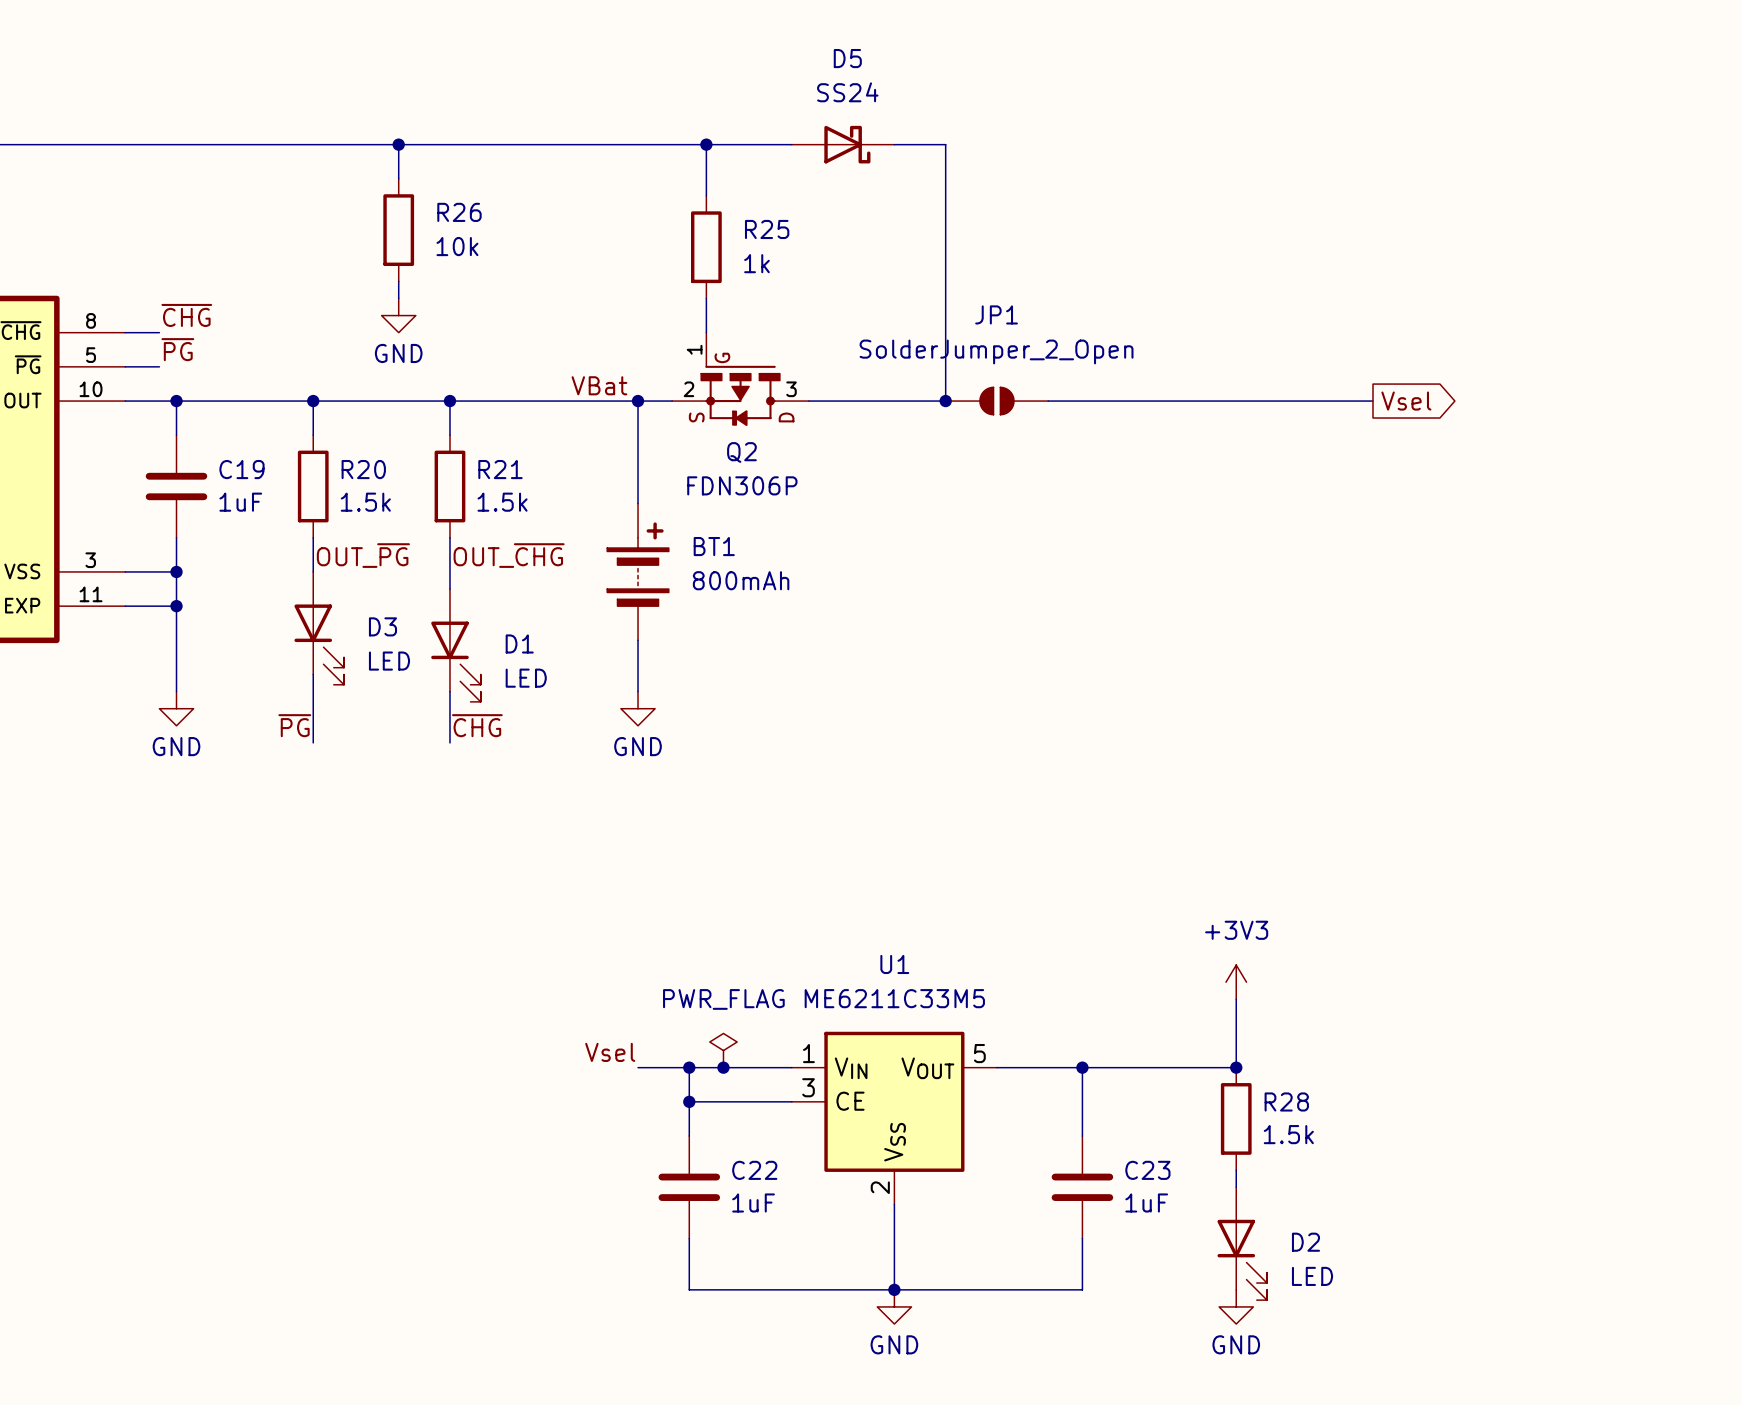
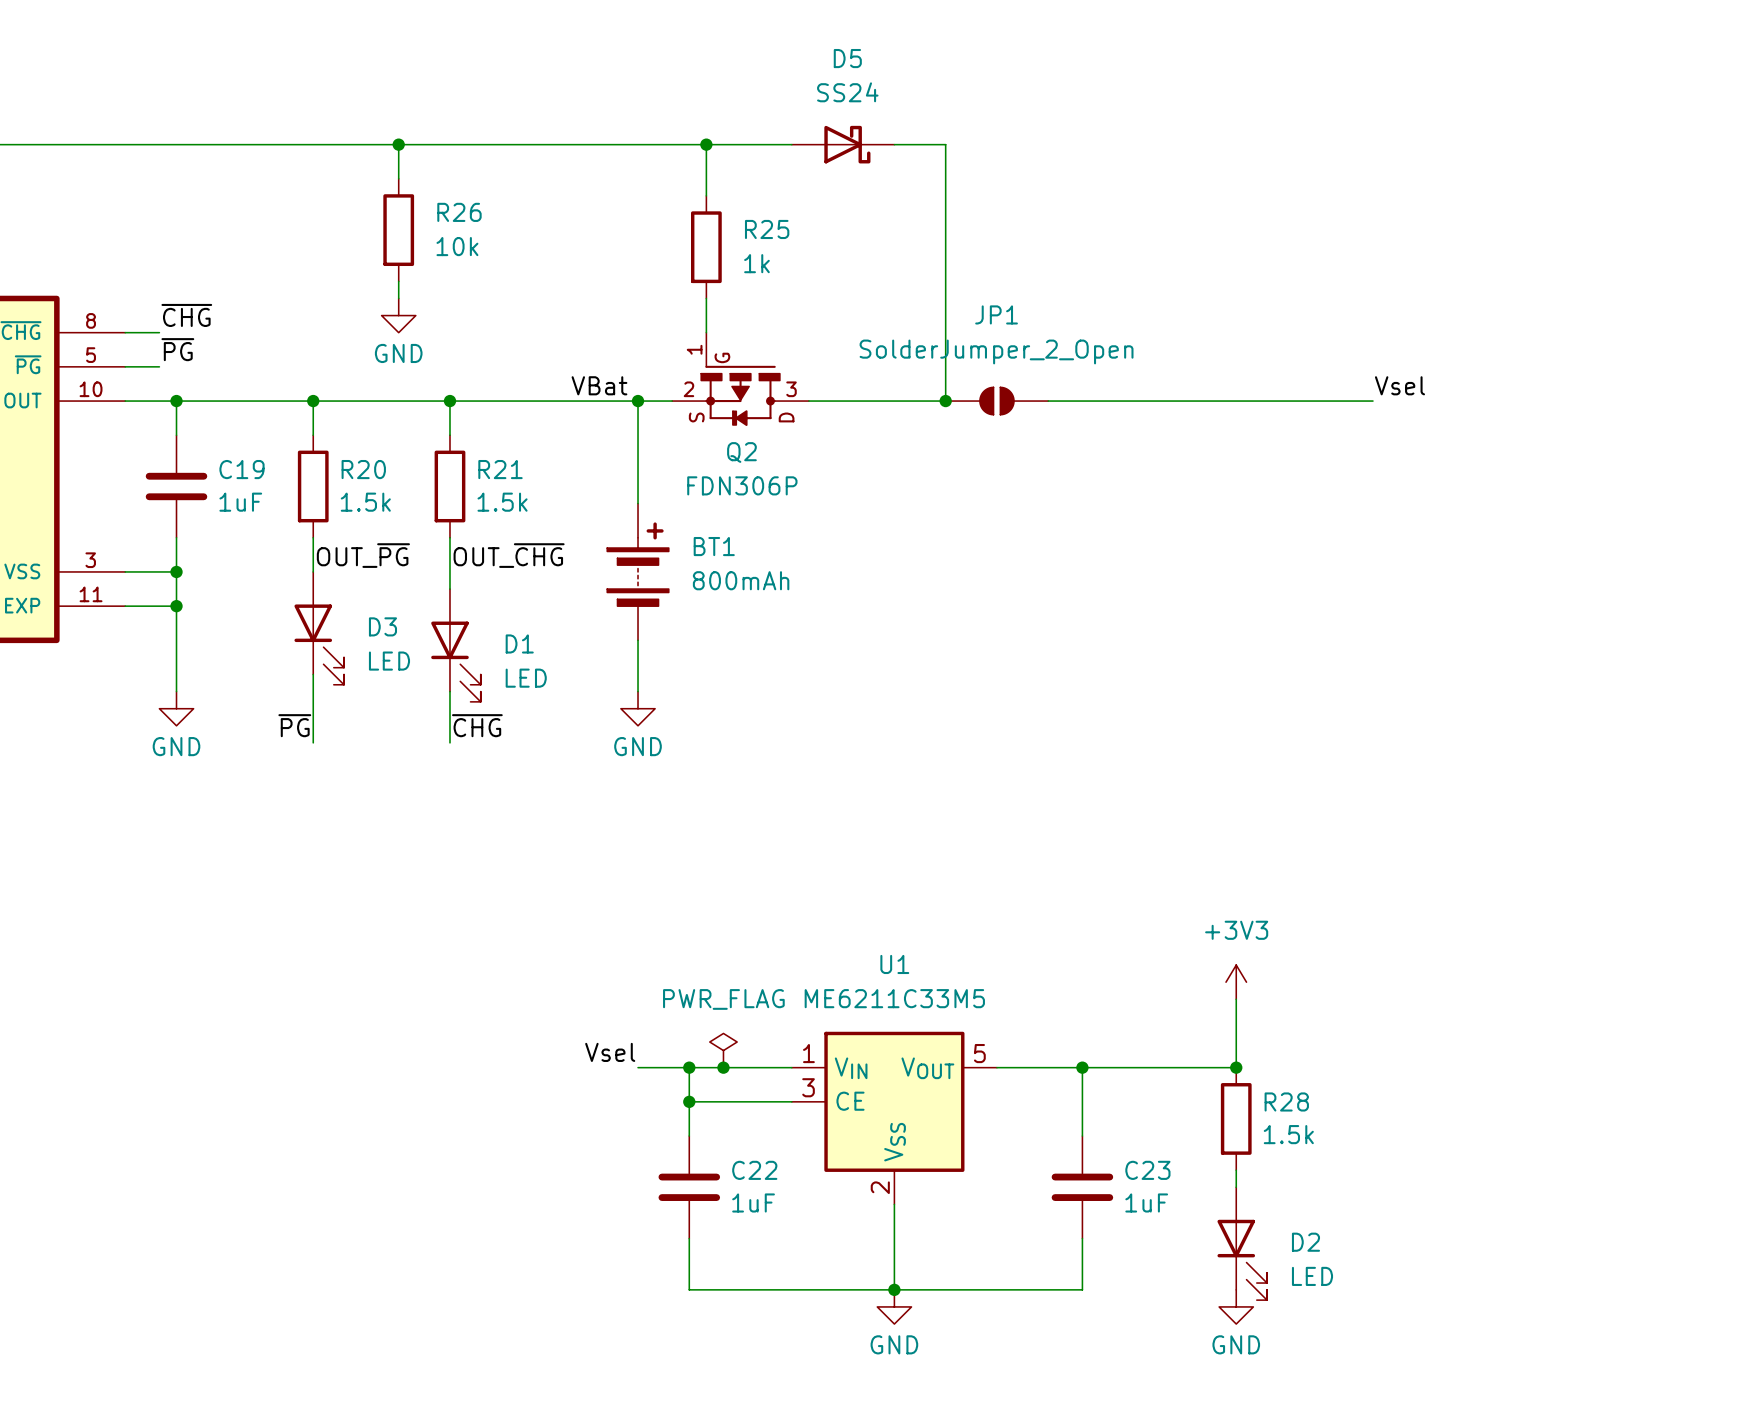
label: none -> Vsel (1399, 385)
global label: Vsel (1406, 401) -> none

